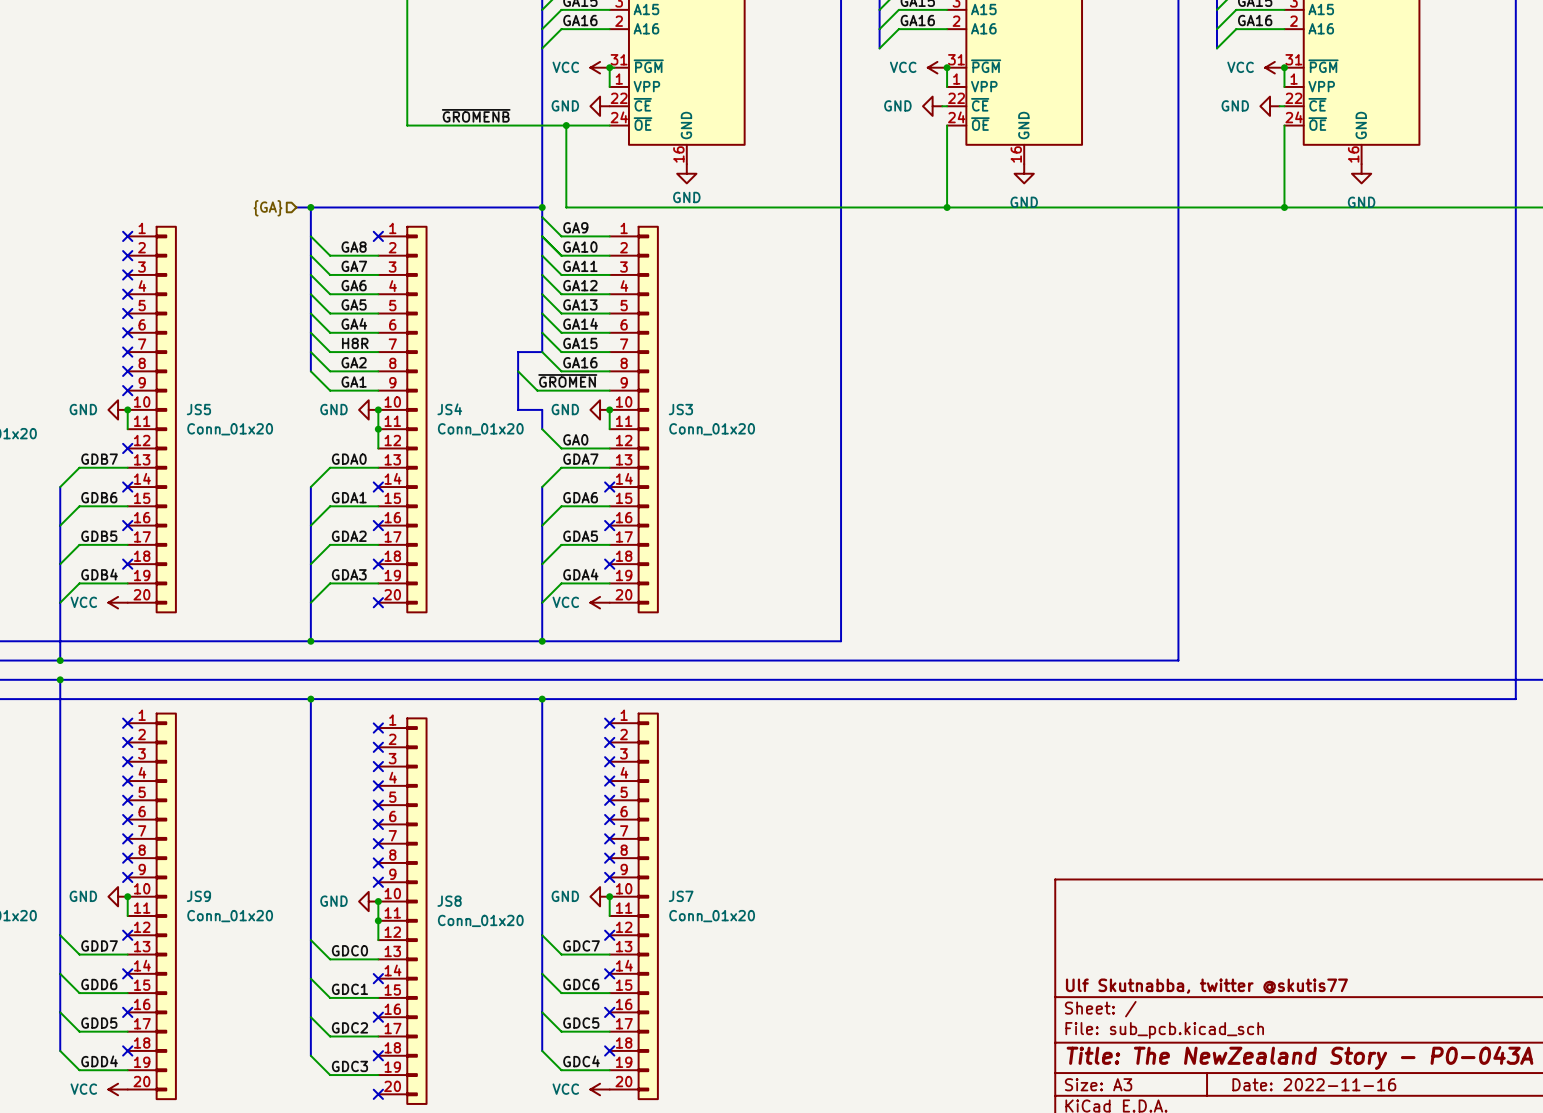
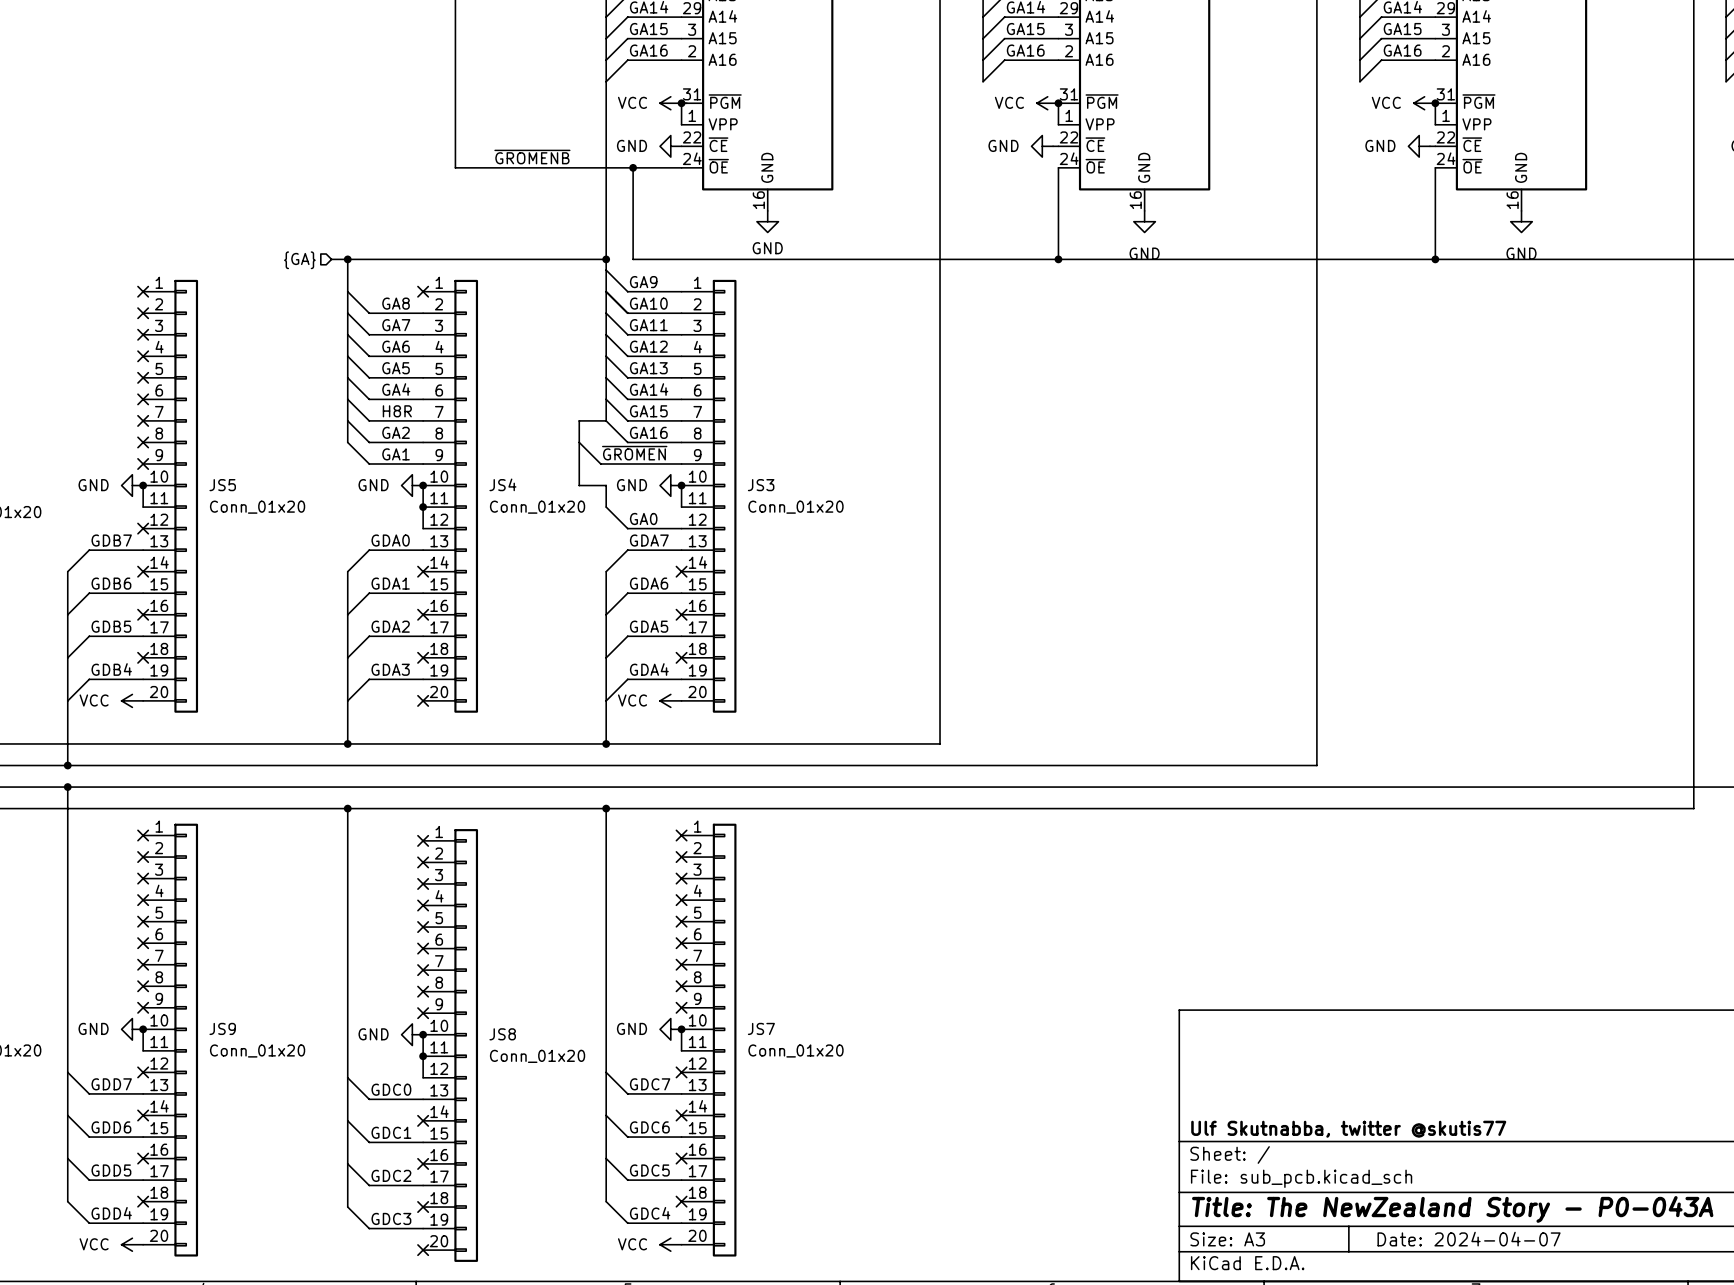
title block: Date: 2022-11-16 (1314, 1084) -> Date: 2024-04-07 (1469, 1239)

